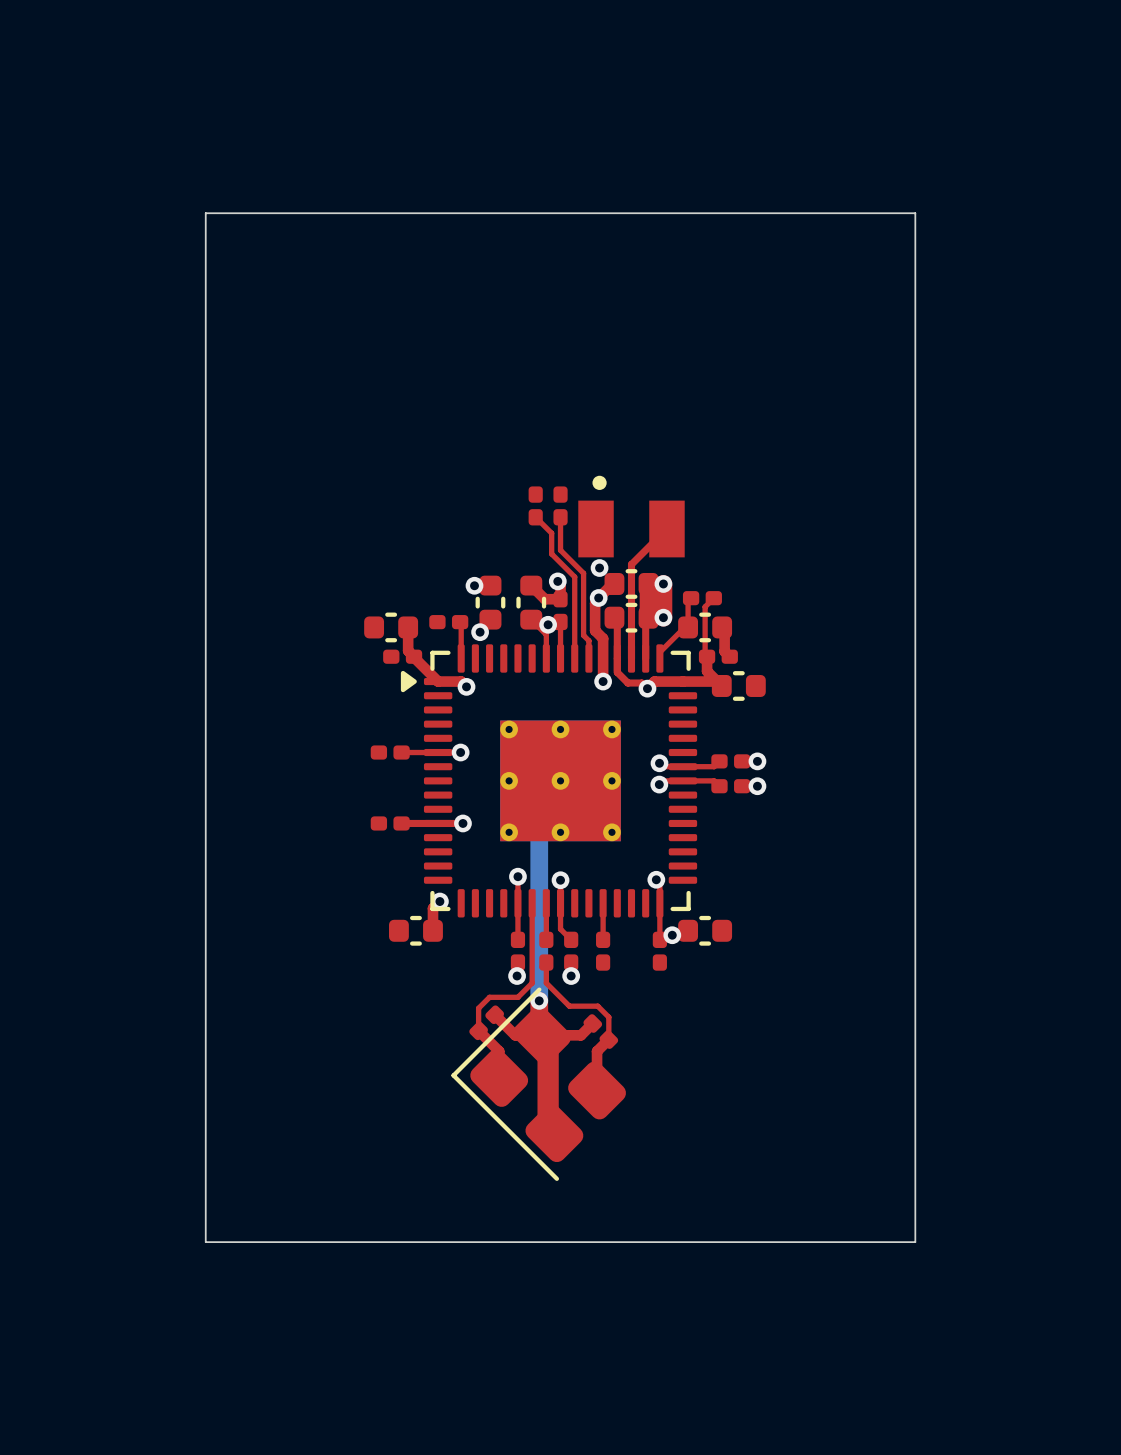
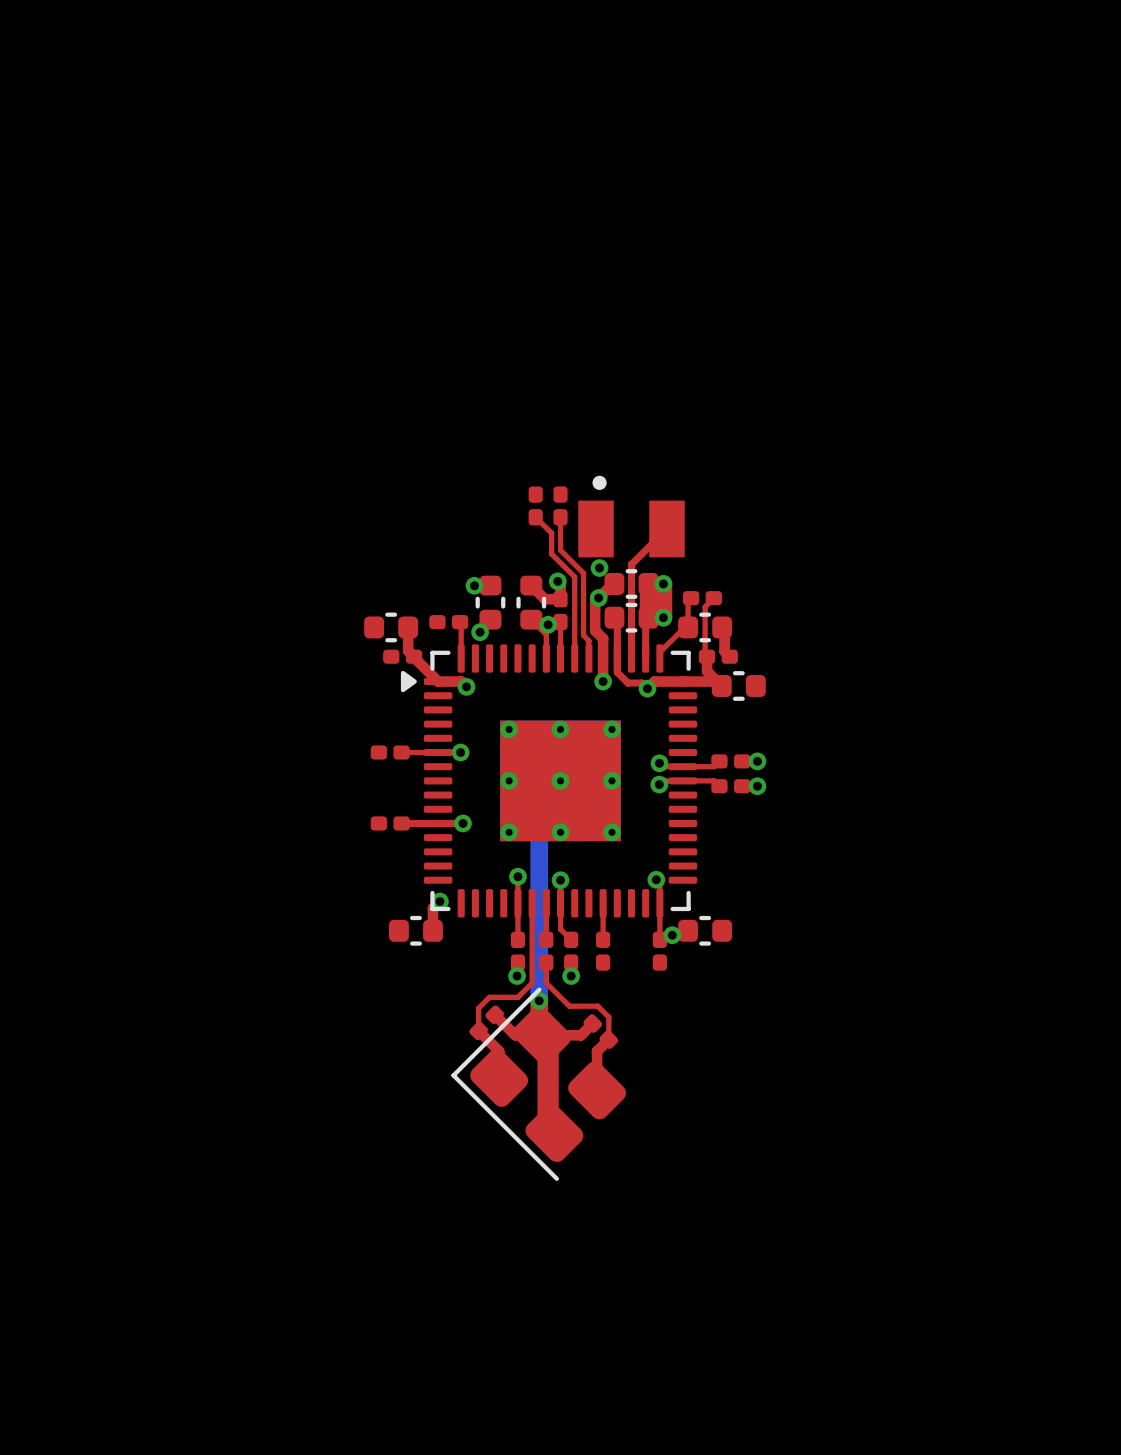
board edge: (205, 213) (915, 213) (915, 1242) (205, 1242) (205, 213) -> none

